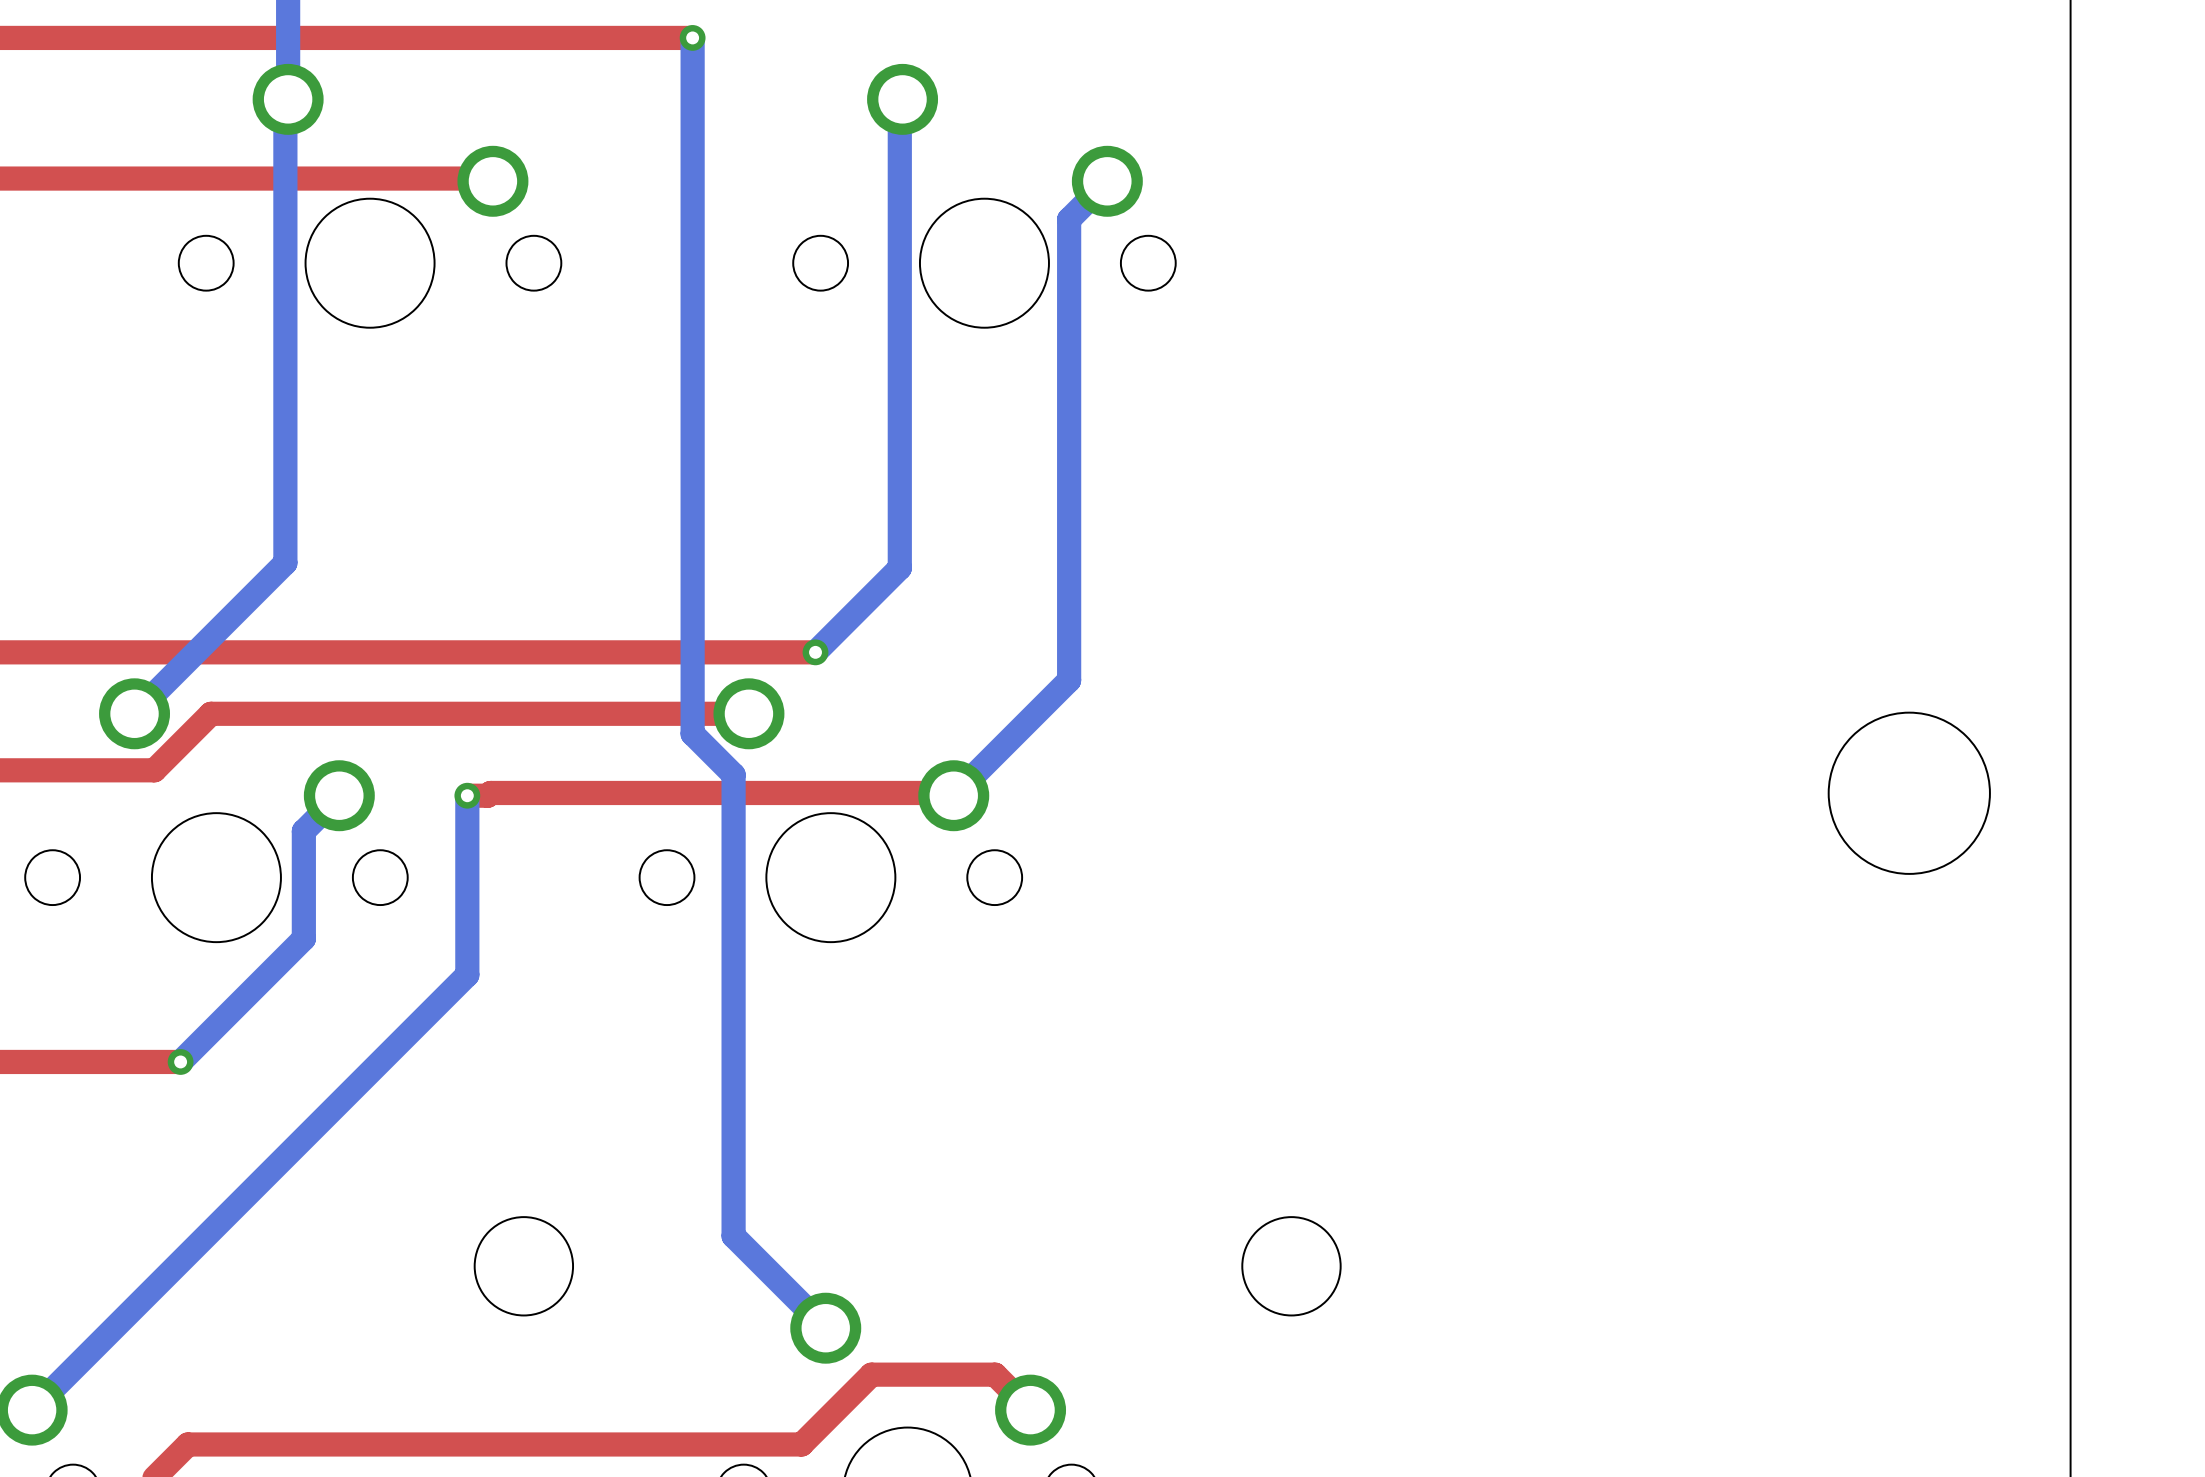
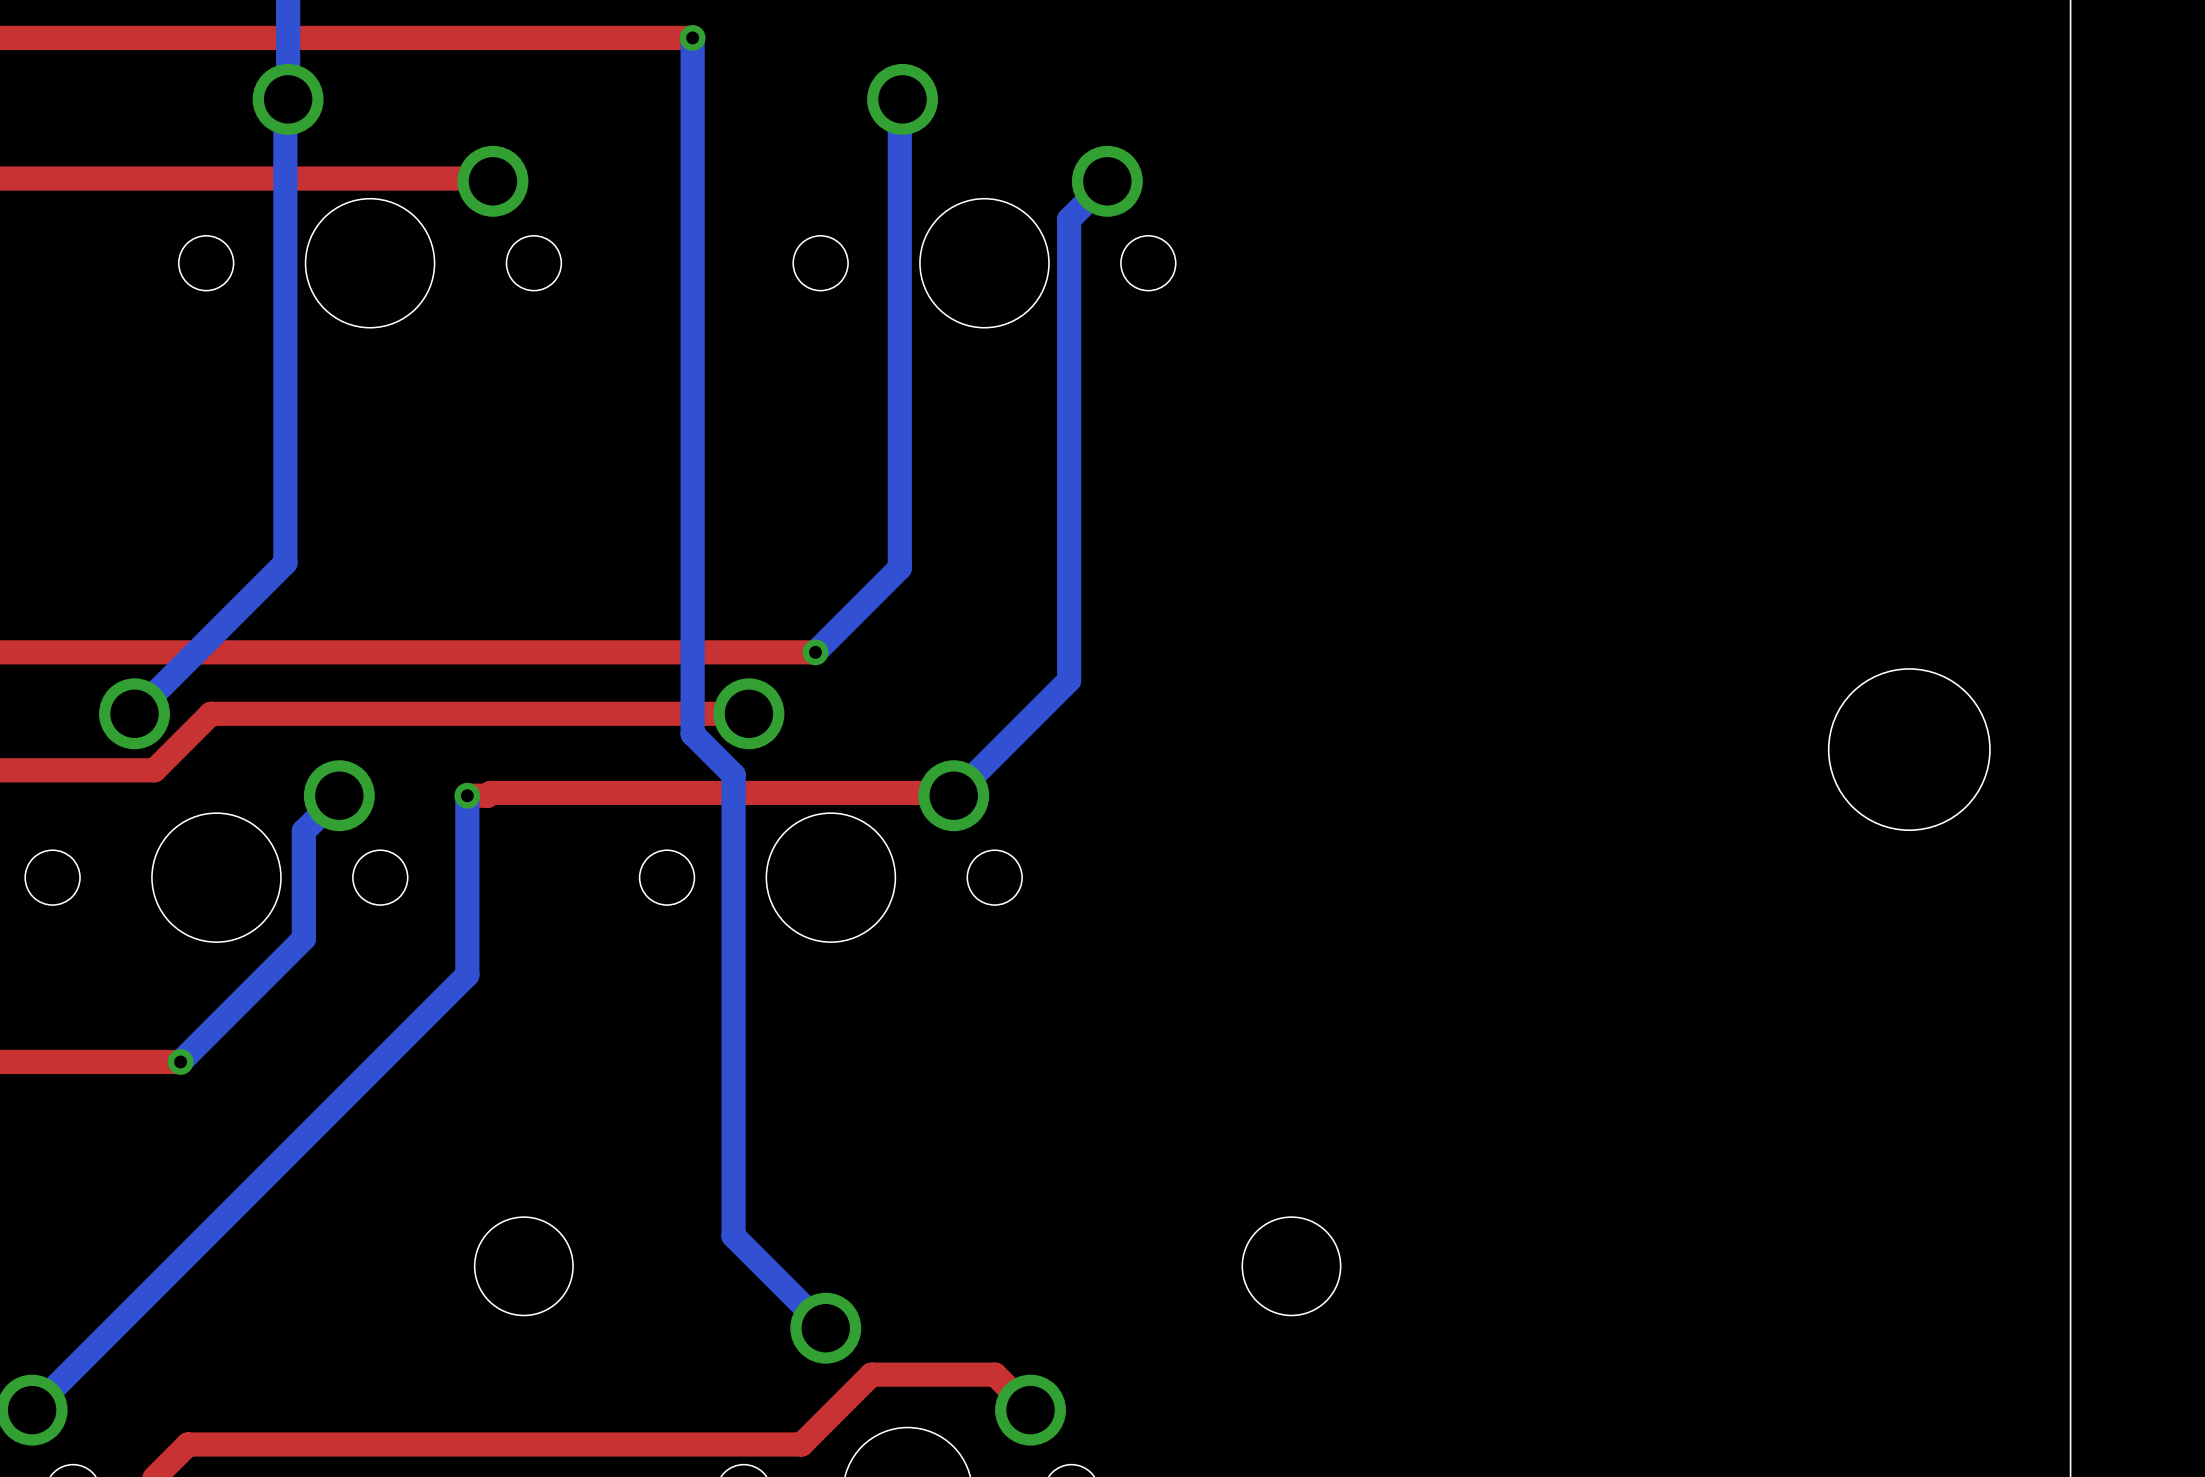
round board edge position: (1909, 793) -> (1909, 749)

